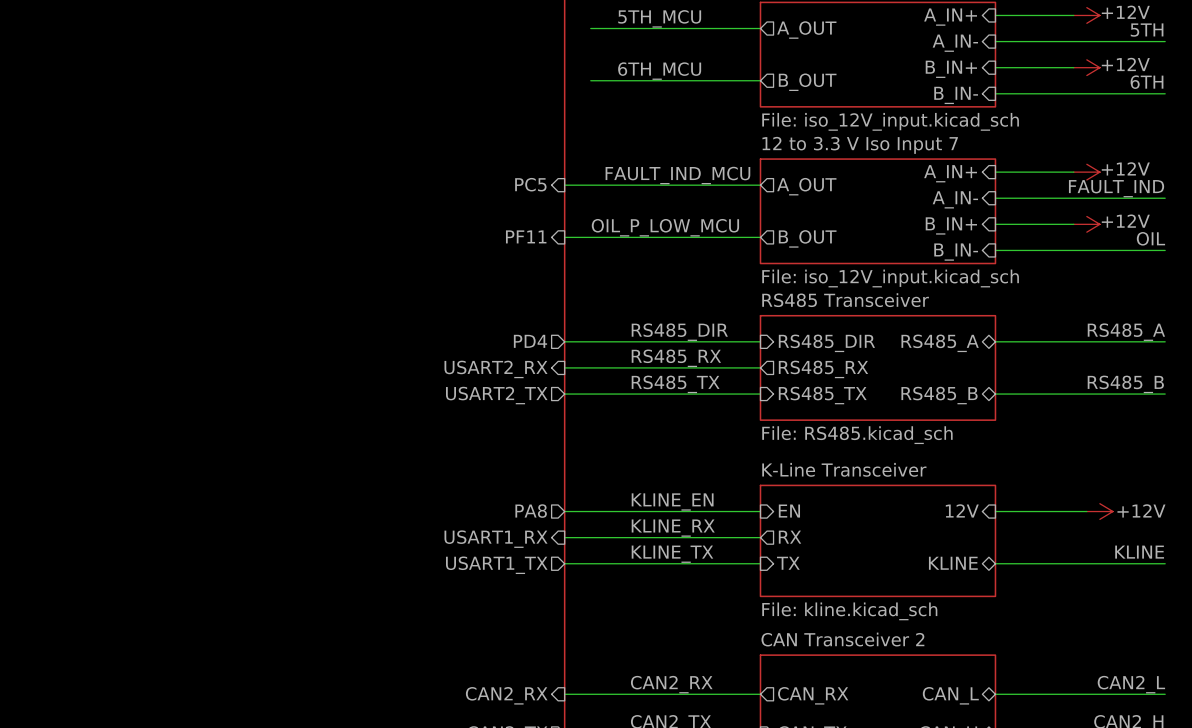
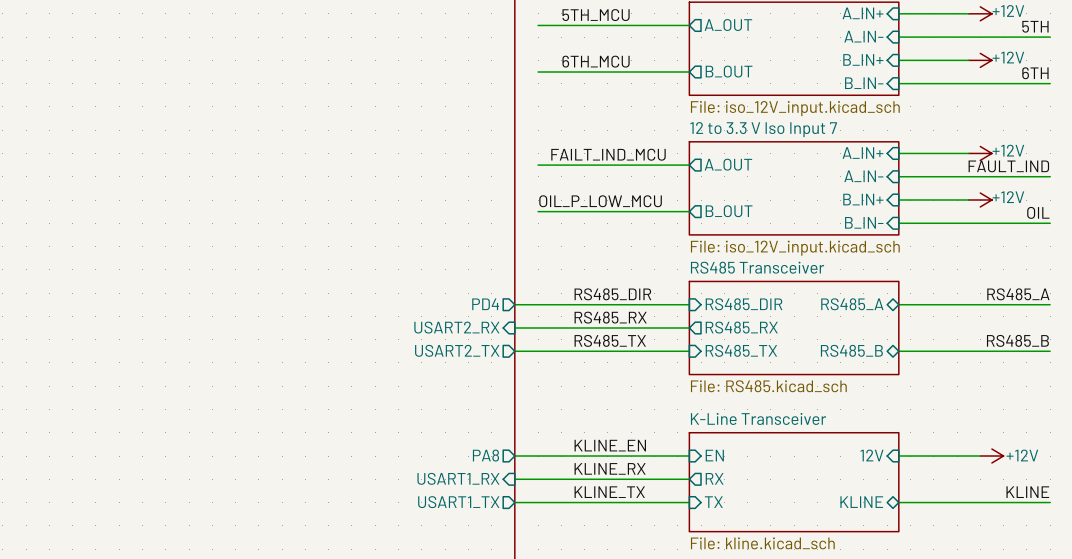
label: FAULT_IND_MCU (677, 175) -> FAILT_IND_MCU (608, 154)
sheet pin: PC5 (530, 184) -> none
wire: (564, 185) (590, 185) -> none
sheet pin: PF11 (526, 236) -> none
wire: (564, 237) (590, 237) -> none

